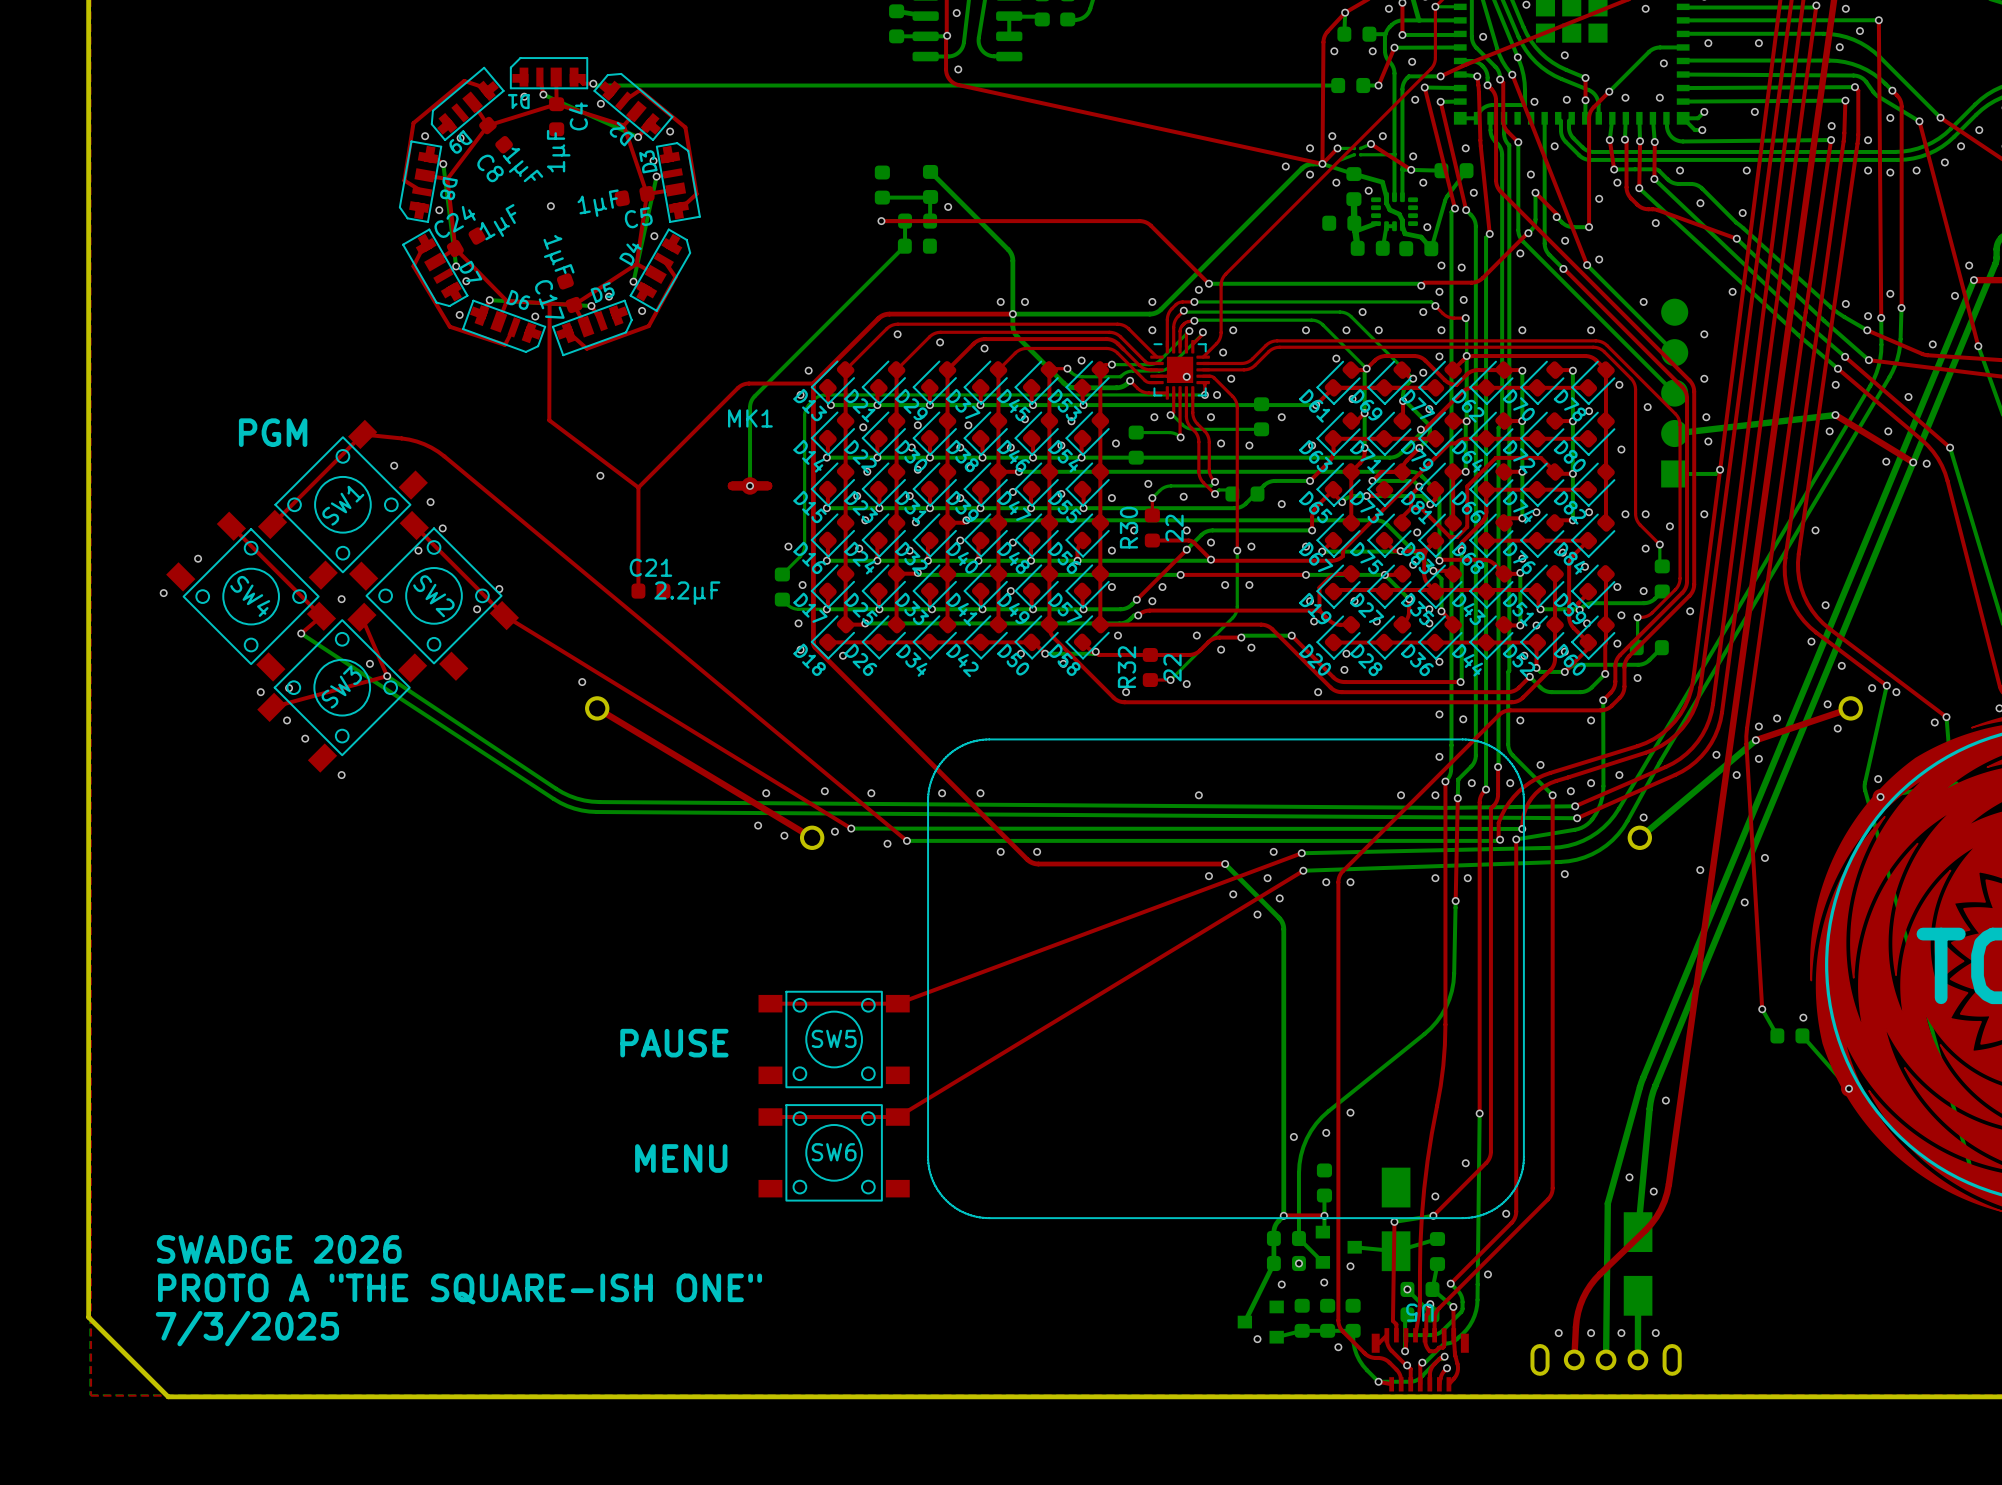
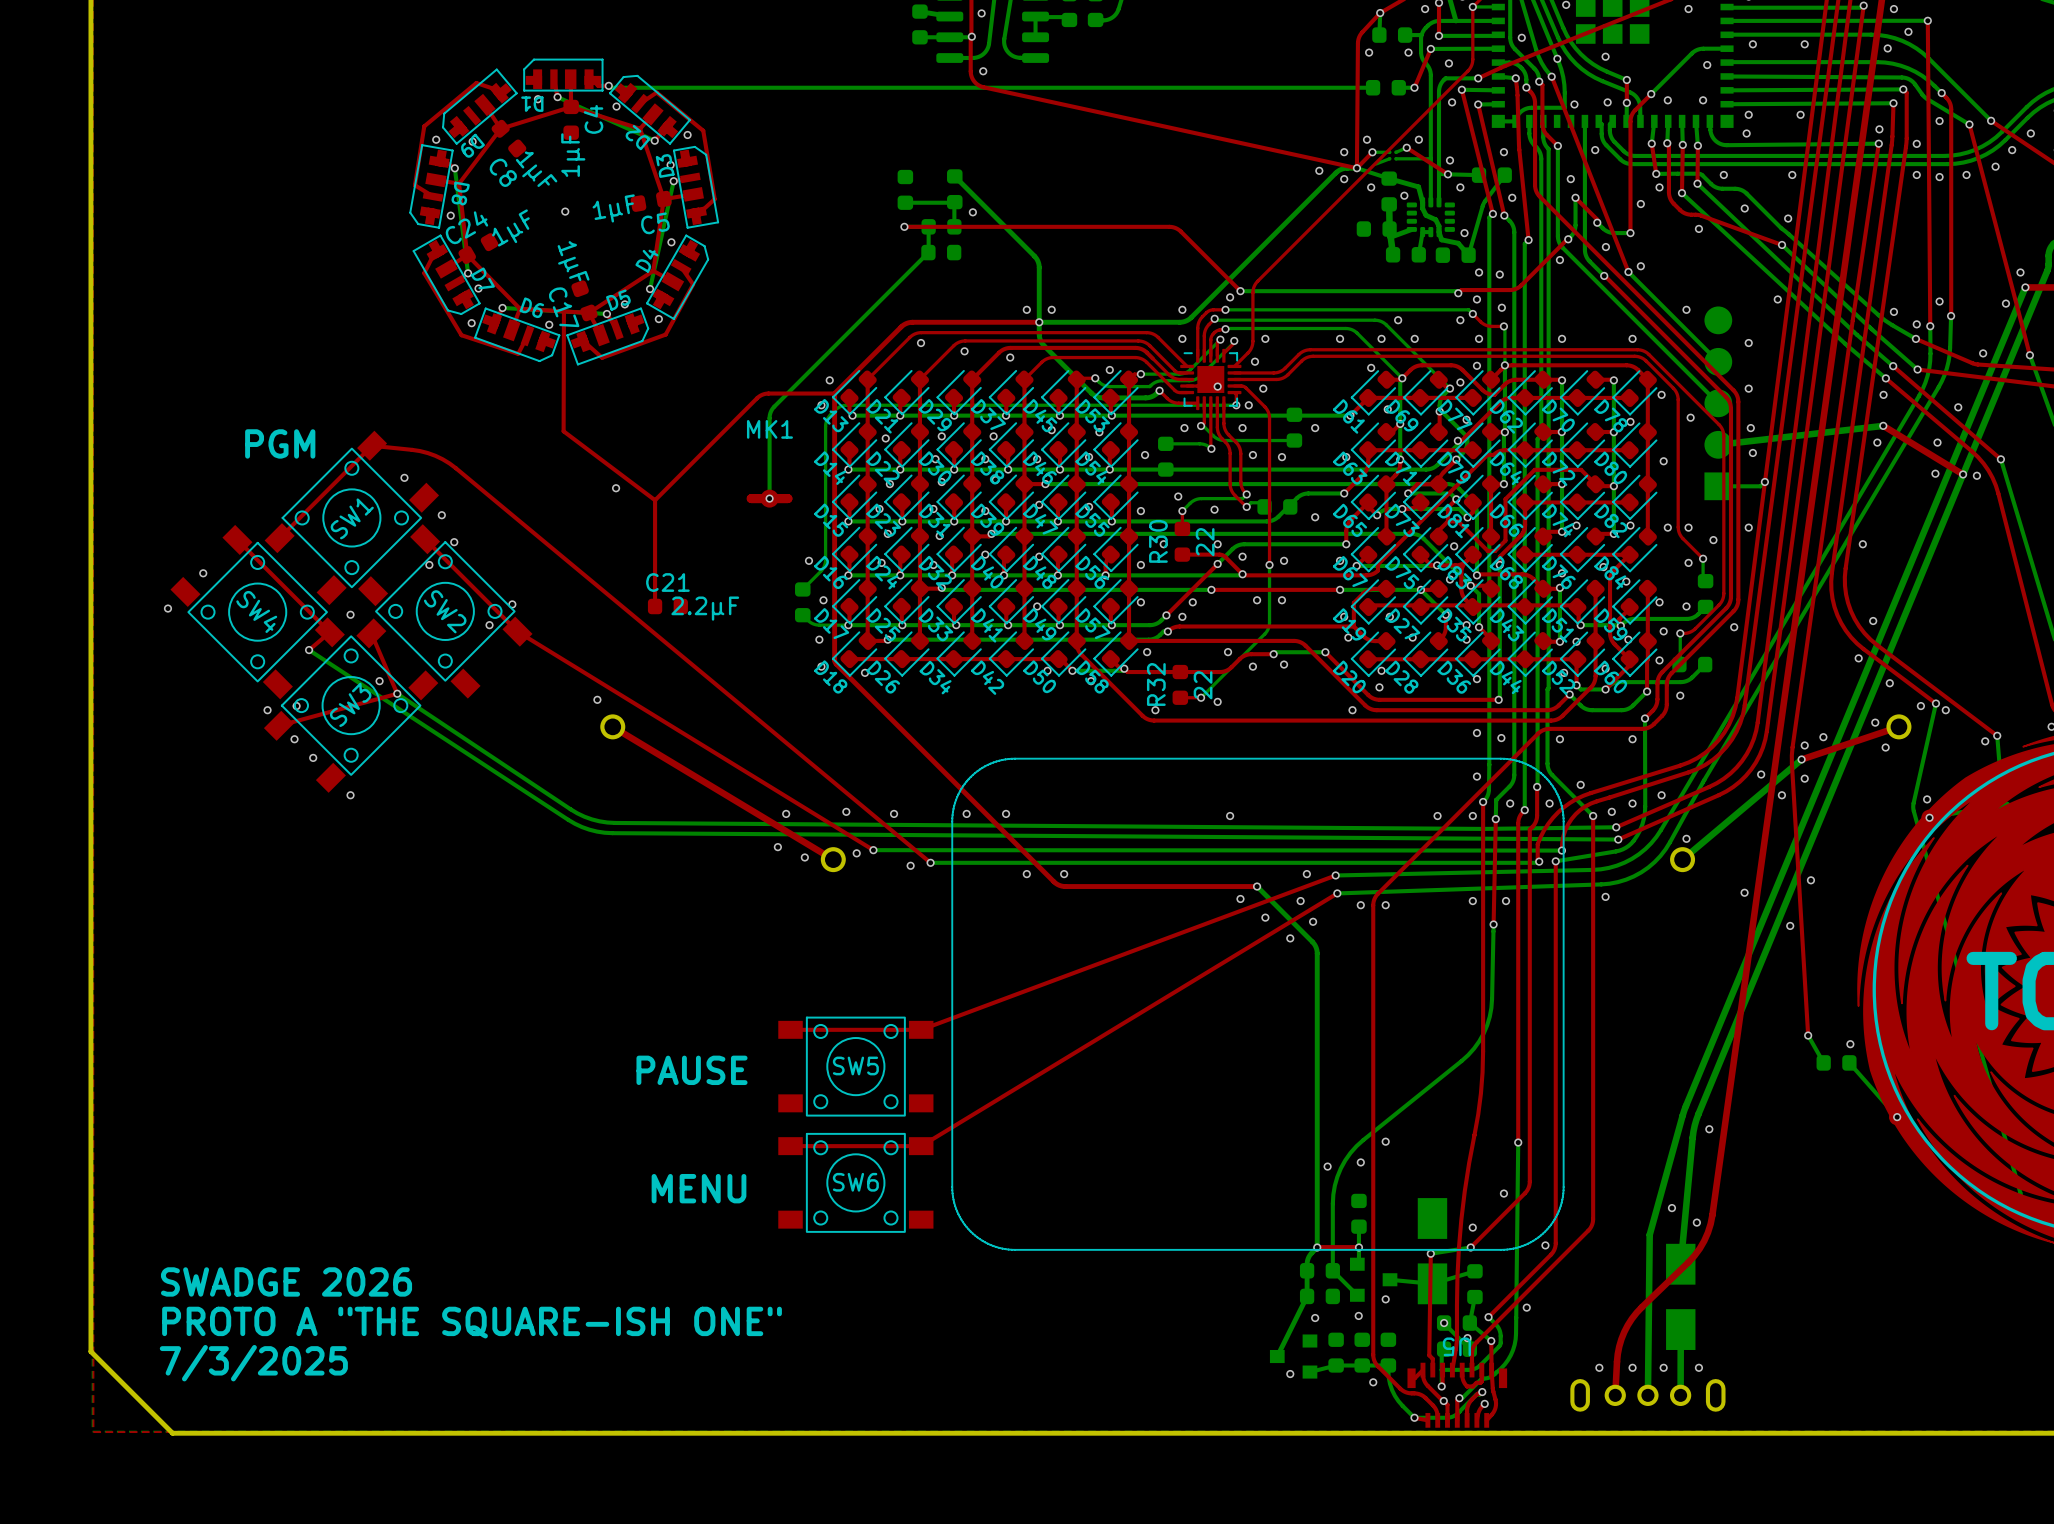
bottom track: (1704, 111) (1697, 118) (1683, 118) (1694, 130) (1702, 130) -> none
via: (1298, 1263) -> none
top track: (1430, 1304) (1426, 1314) (1425, 1335) -> none

